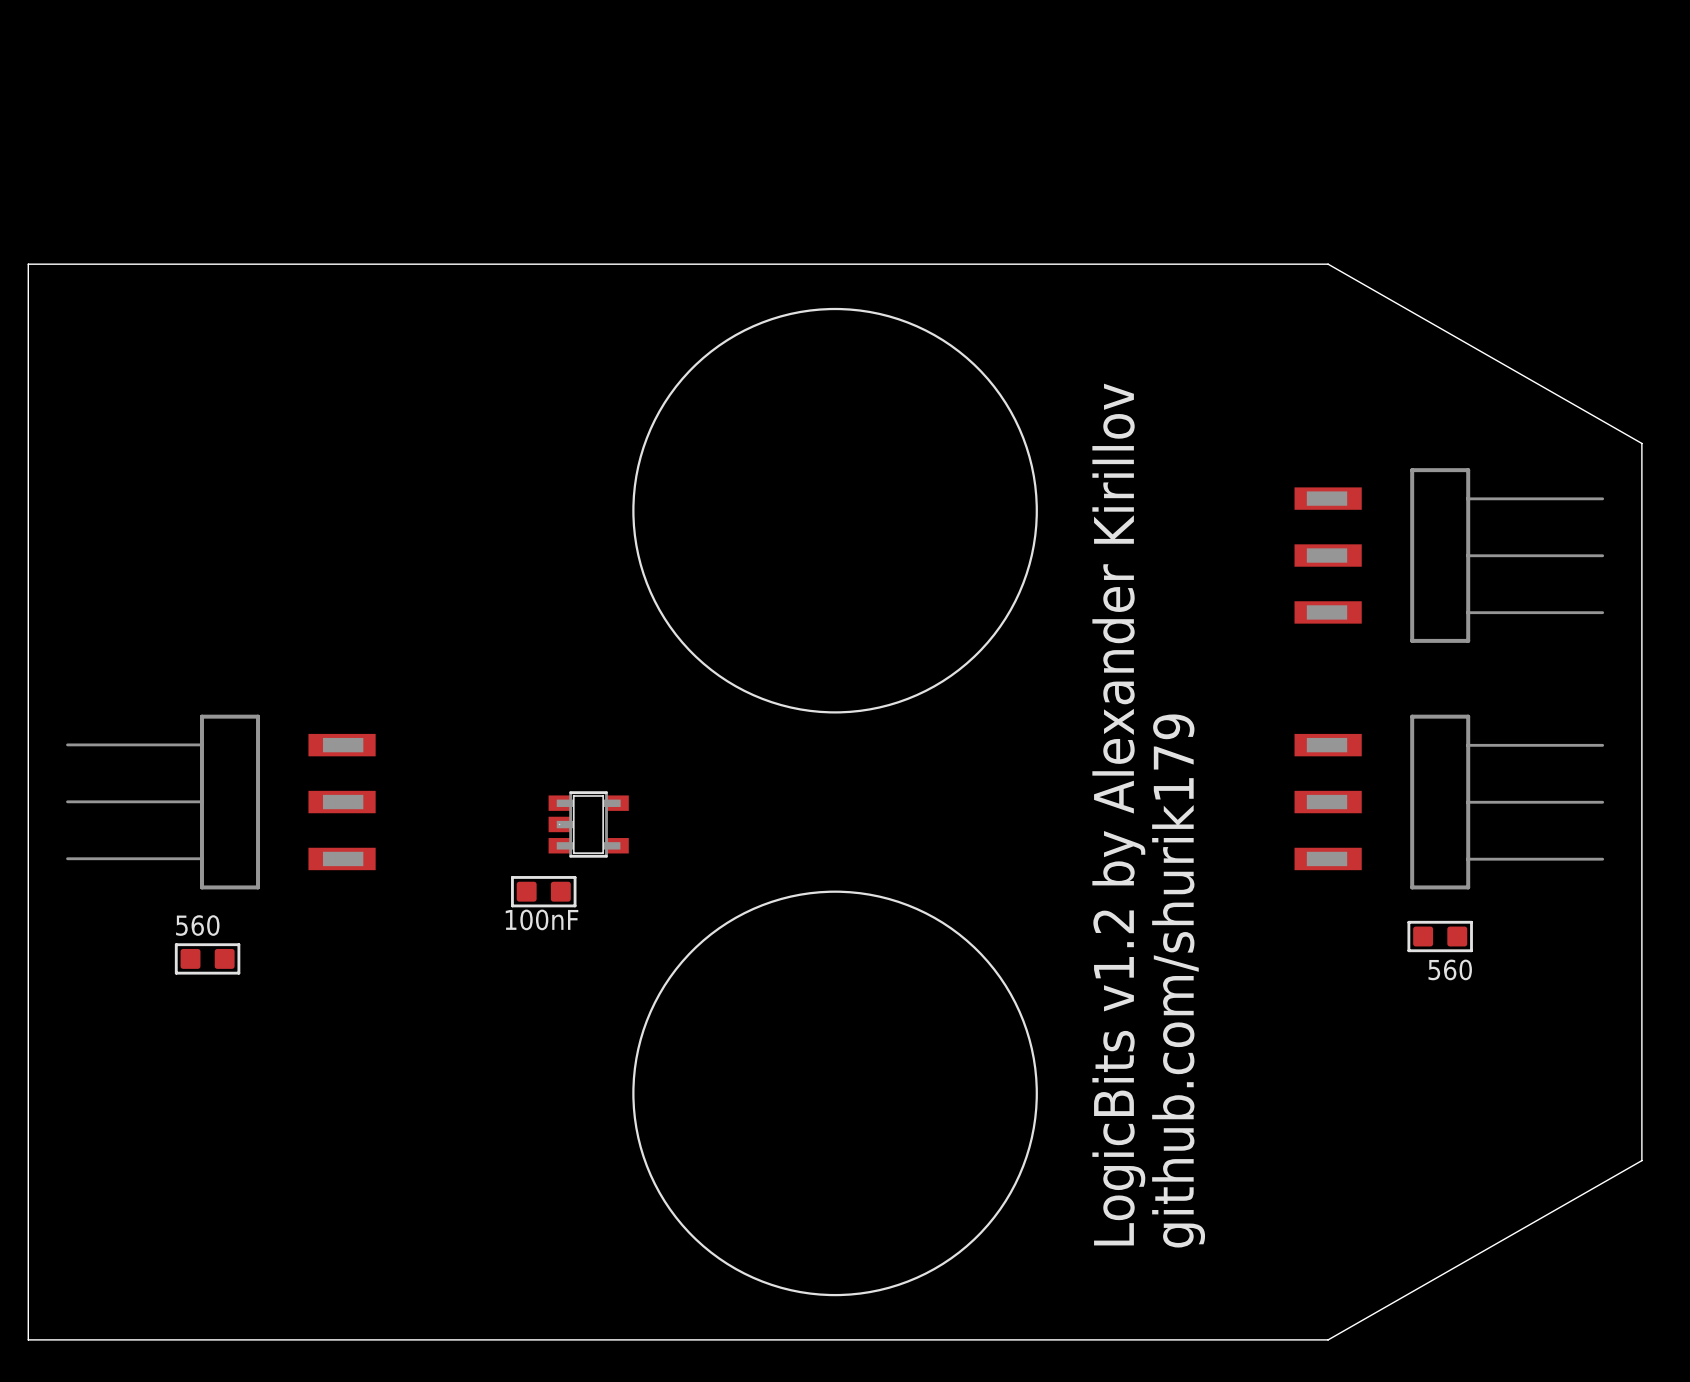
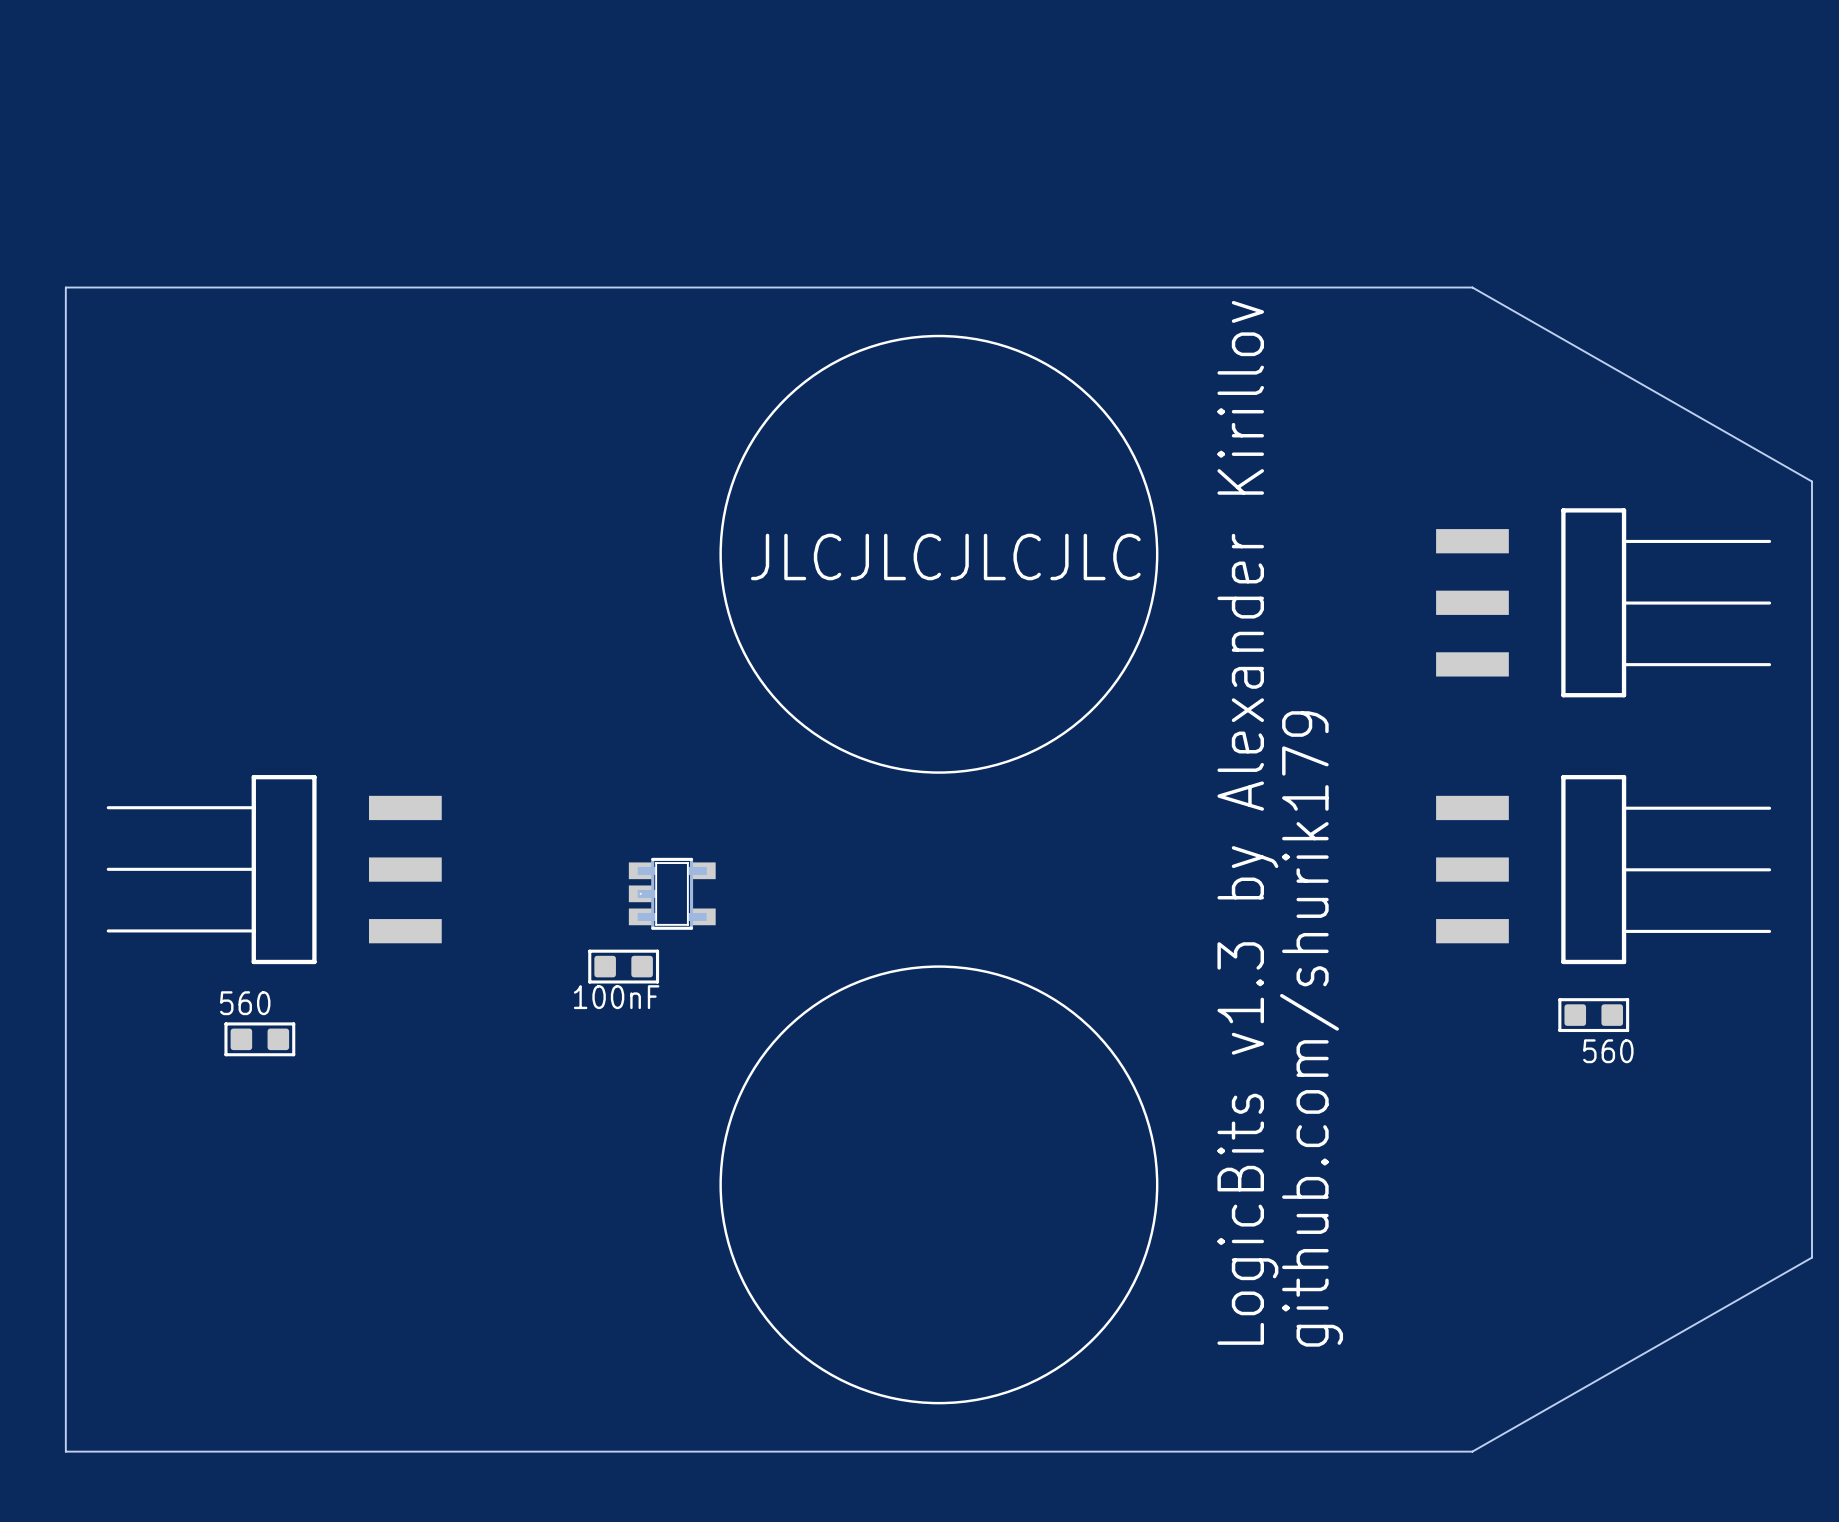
part footprint: [1294, 468, 1605, 643] -> [1436, 508, 1772, 698]
text: none -> JLCJLCJLCJLC (945, 556)
part footprint: [66, 714, 376, 890] -> [106, 775, 442, 965]
part footprint: [1294, 714, 1605, 890] -> [1436, 775, 1772, 965]
text: LogicBits v1.2 by Alexander Kirillov (1118, 814) -> LogicBits v1.3 by Alexander Kirillov (1247, 822)

